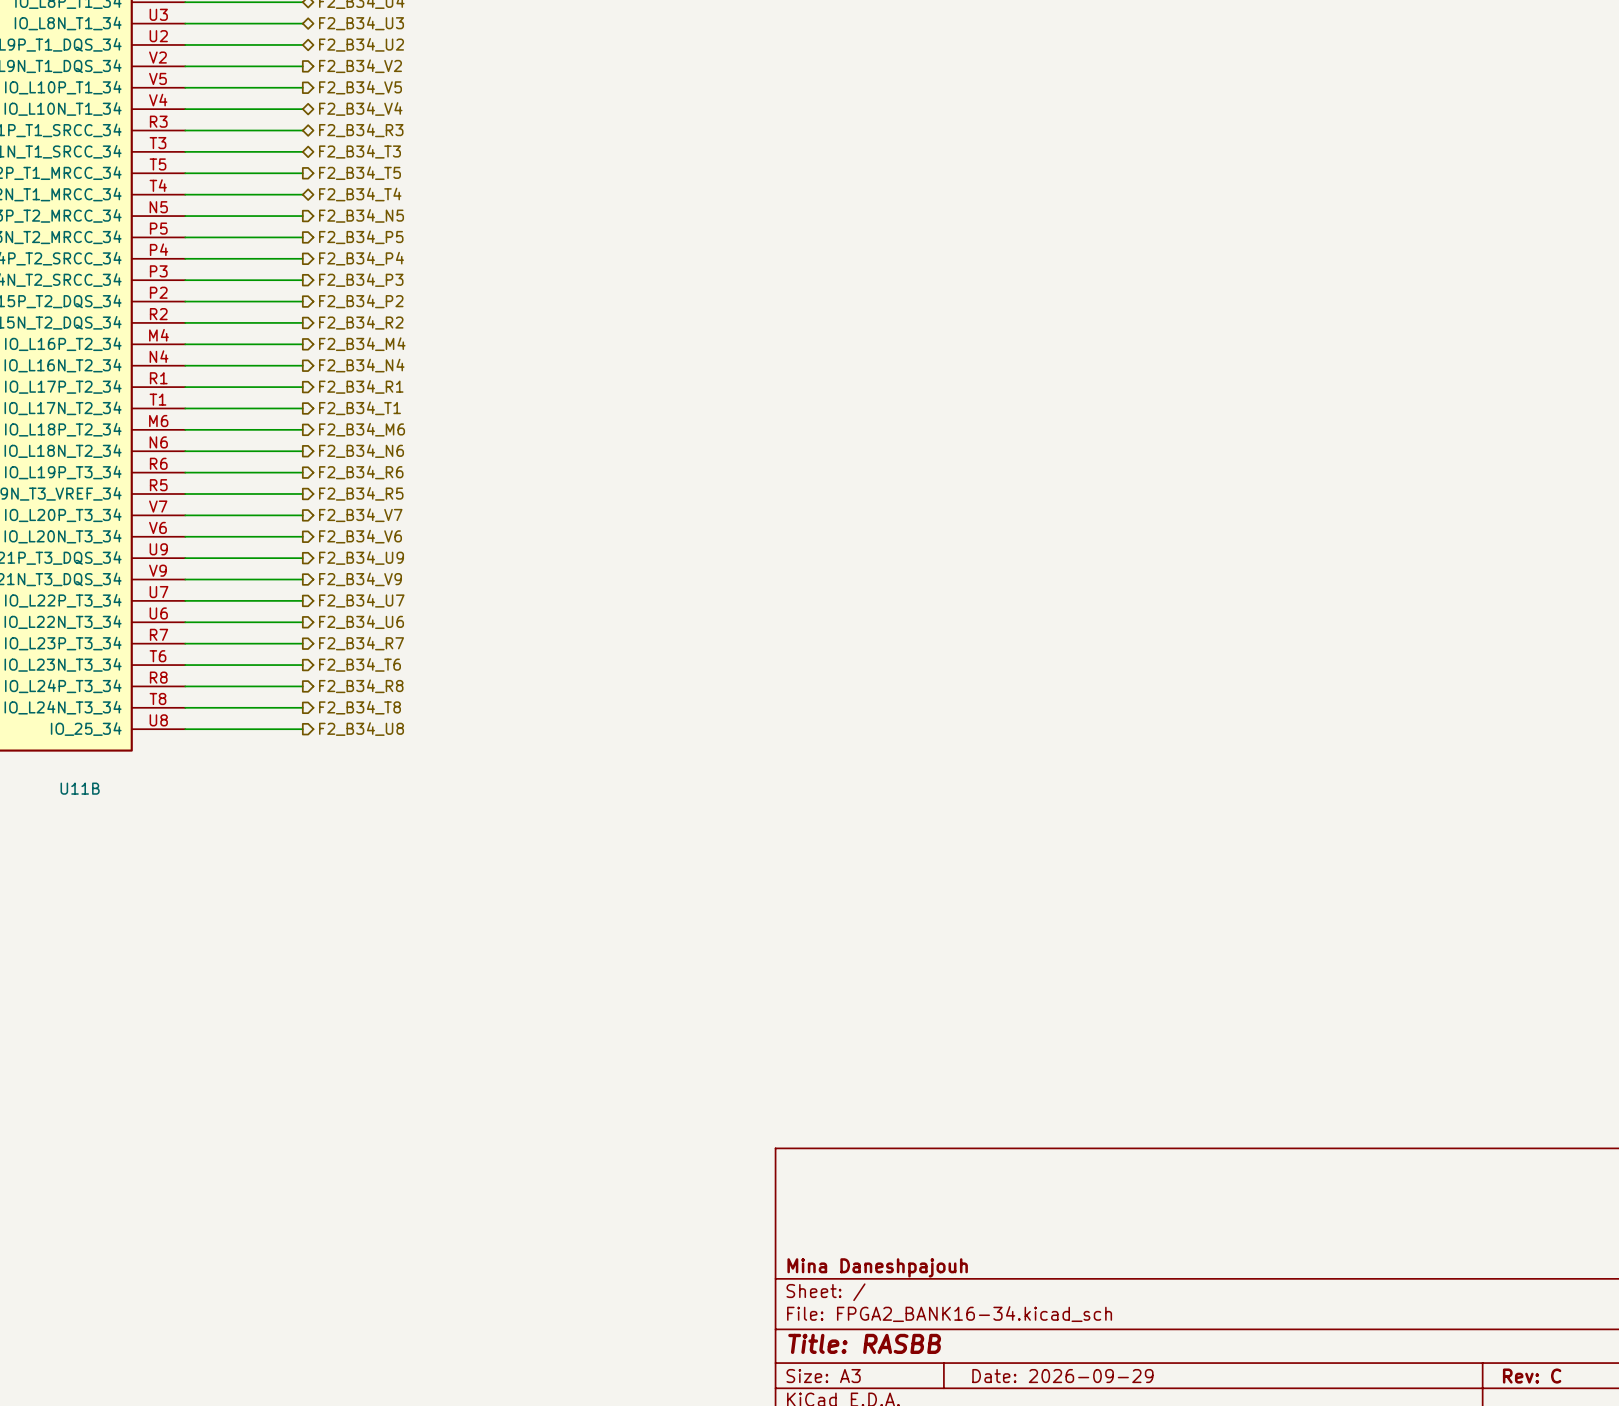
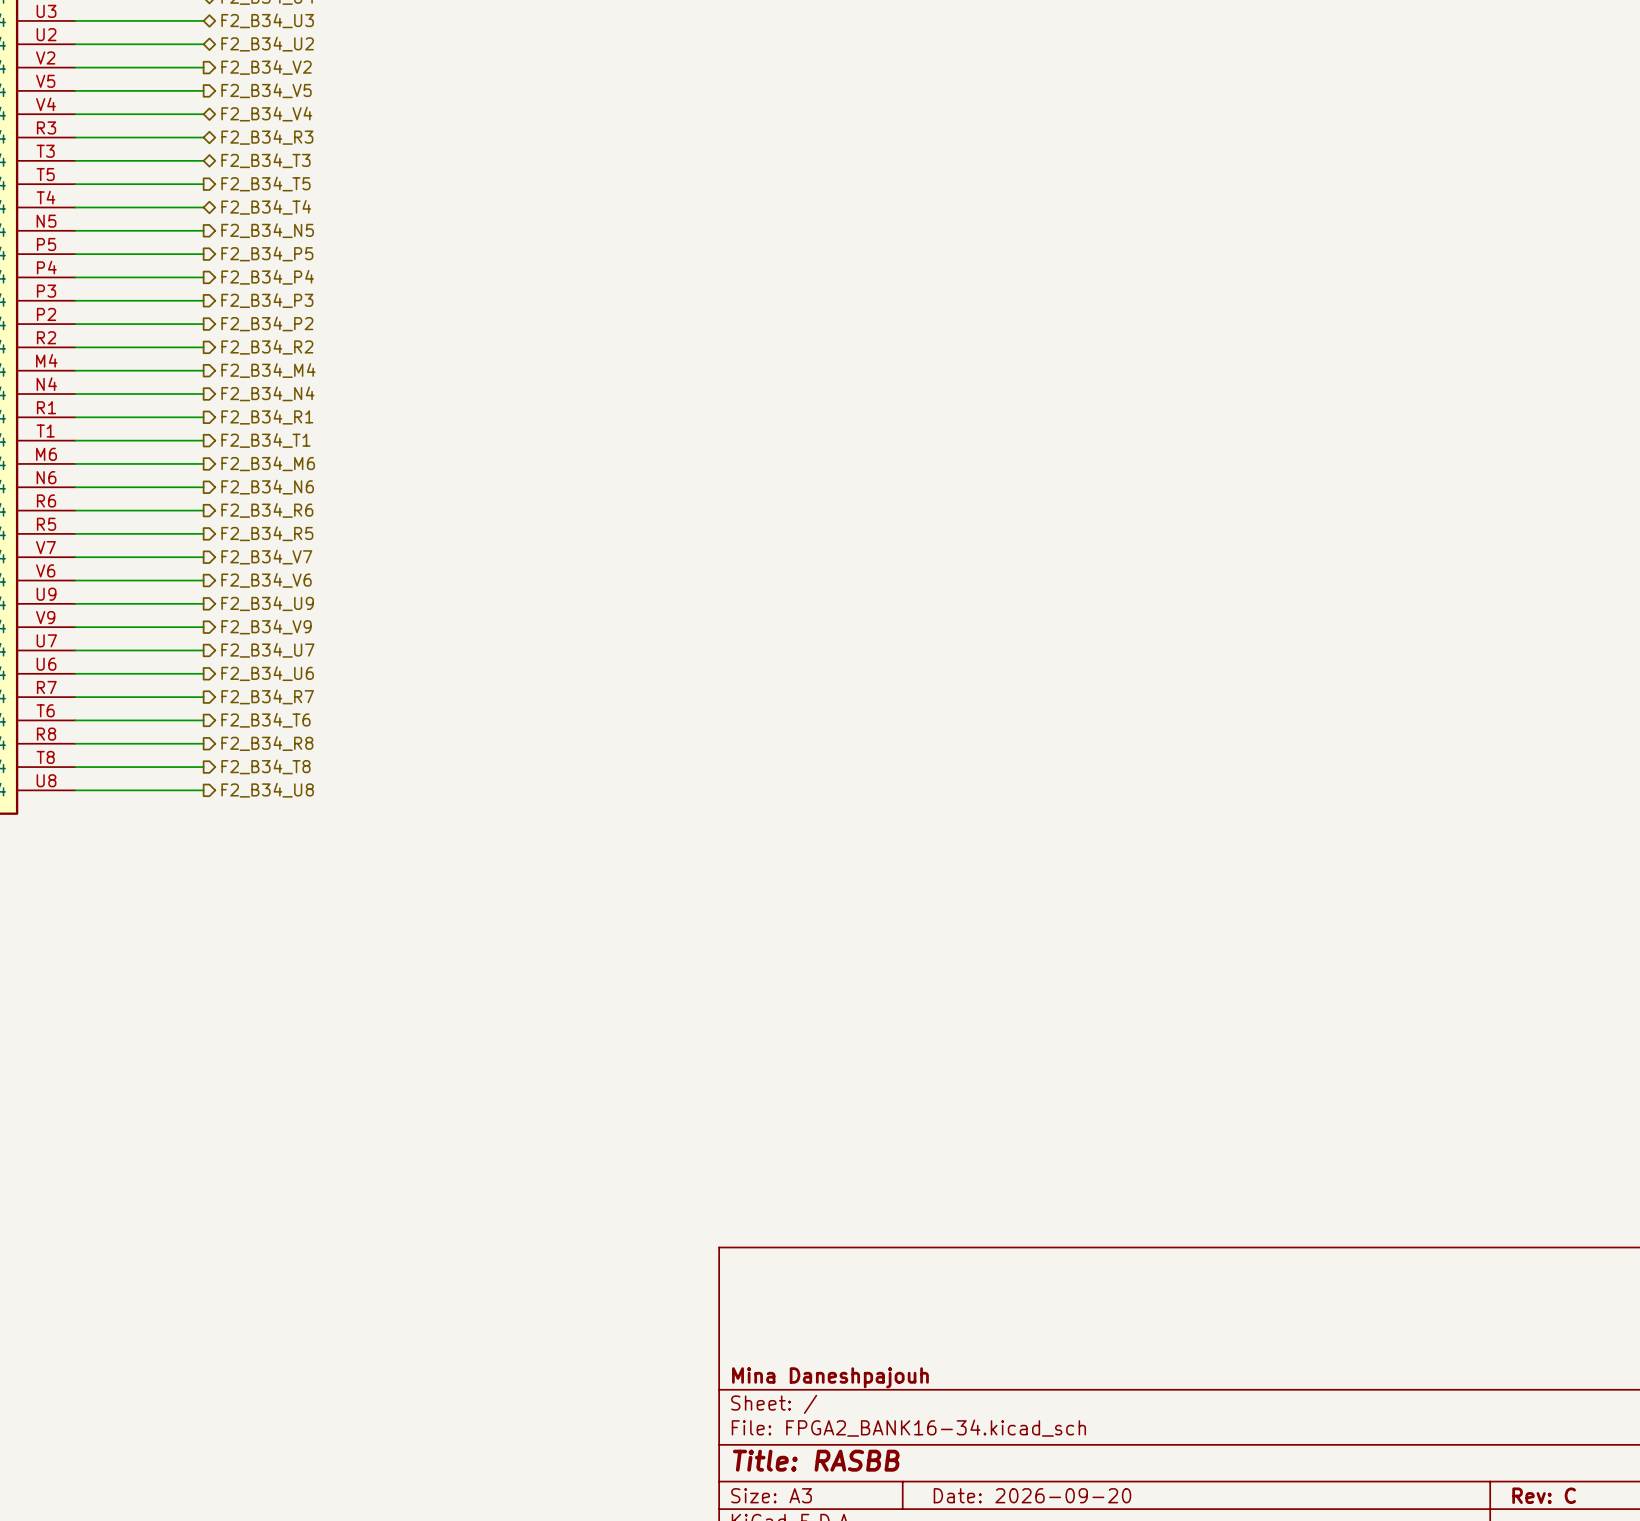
title block: Date: 2026-09-29 (1062, 1376) -> Date: 2026-09-20 (1032, 1495)

